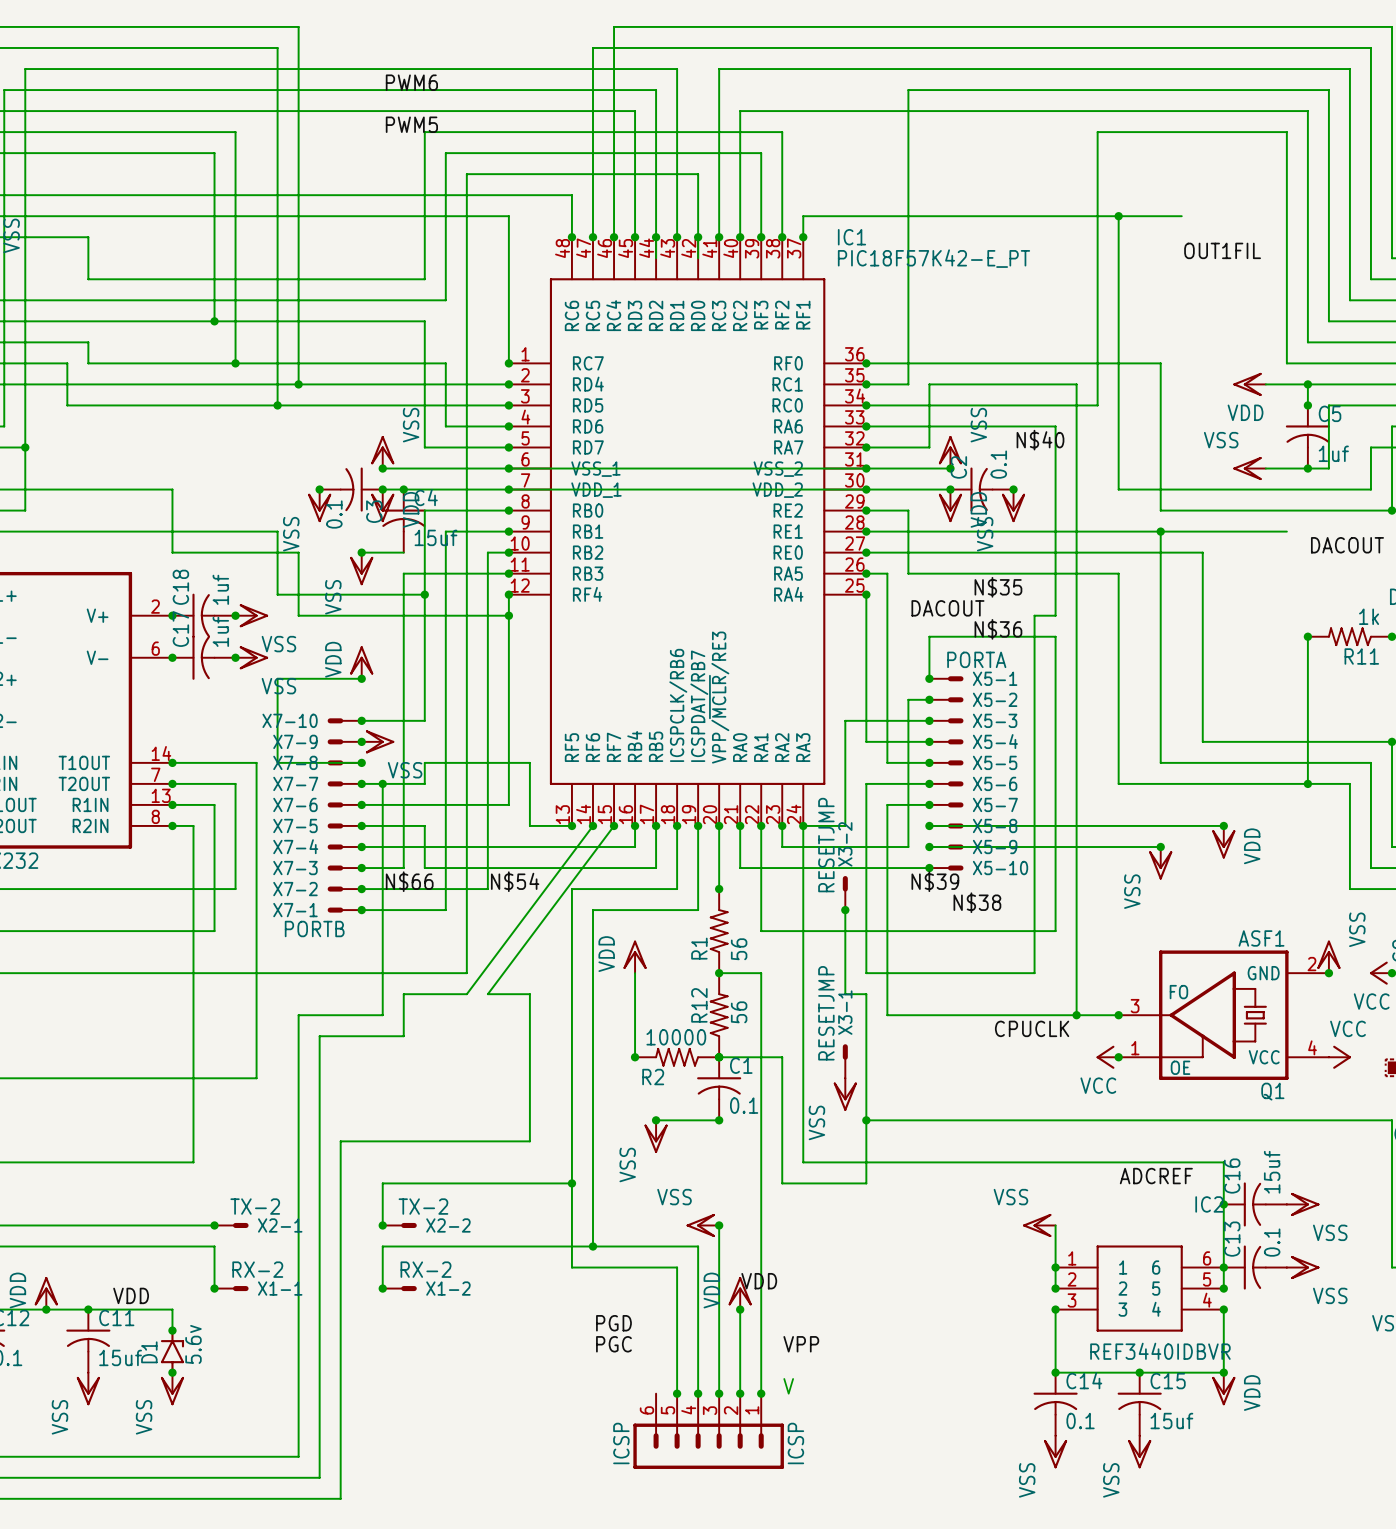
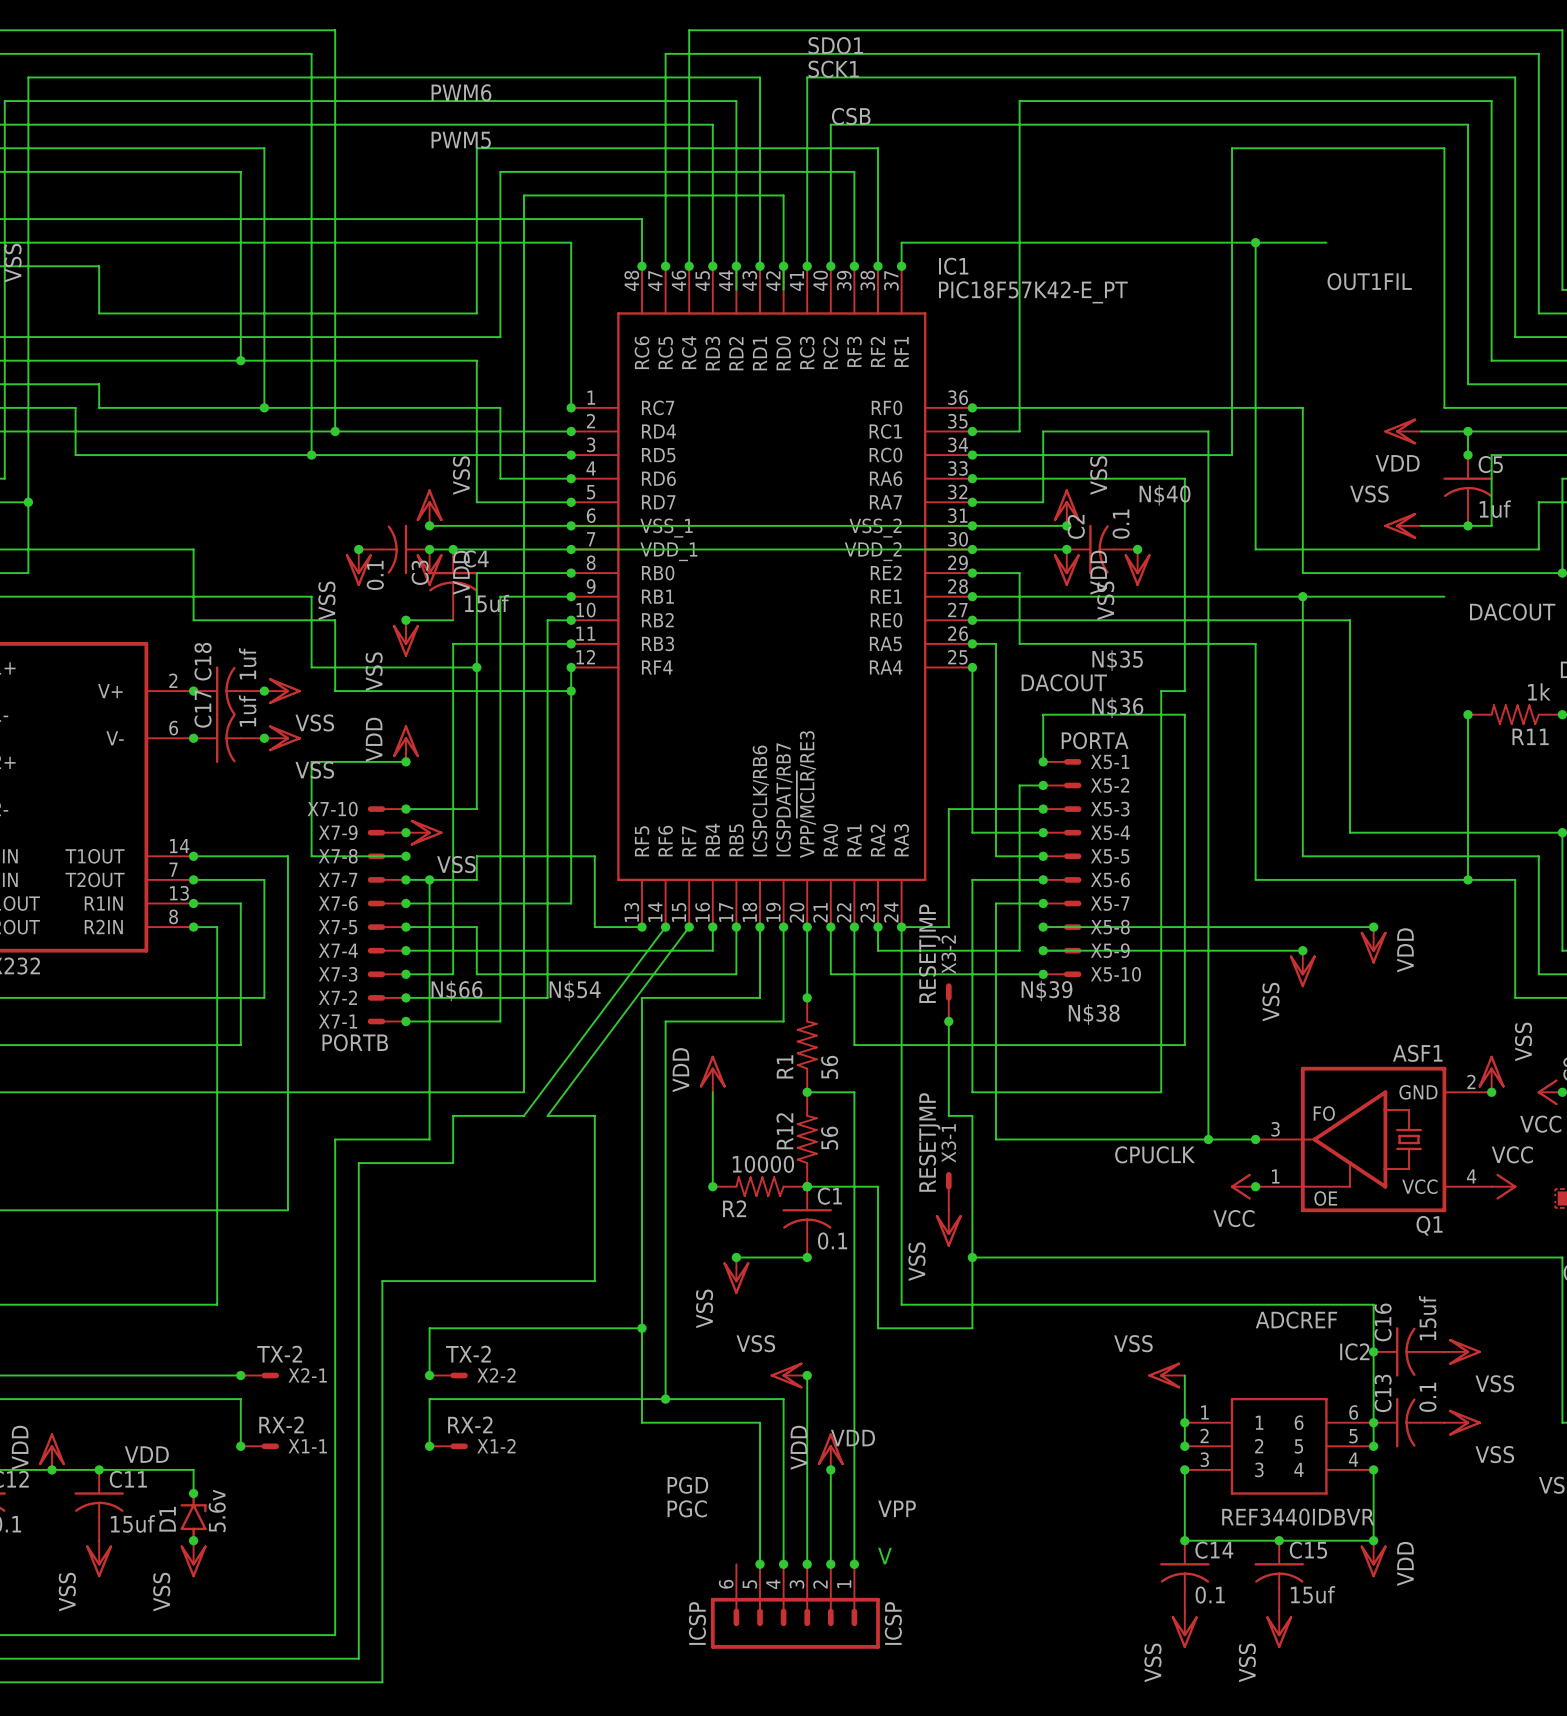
label: none -> SDO1 (835, 45)
label: none -> SCK1 (833, 69)
label: none -> CSB (851, 116)

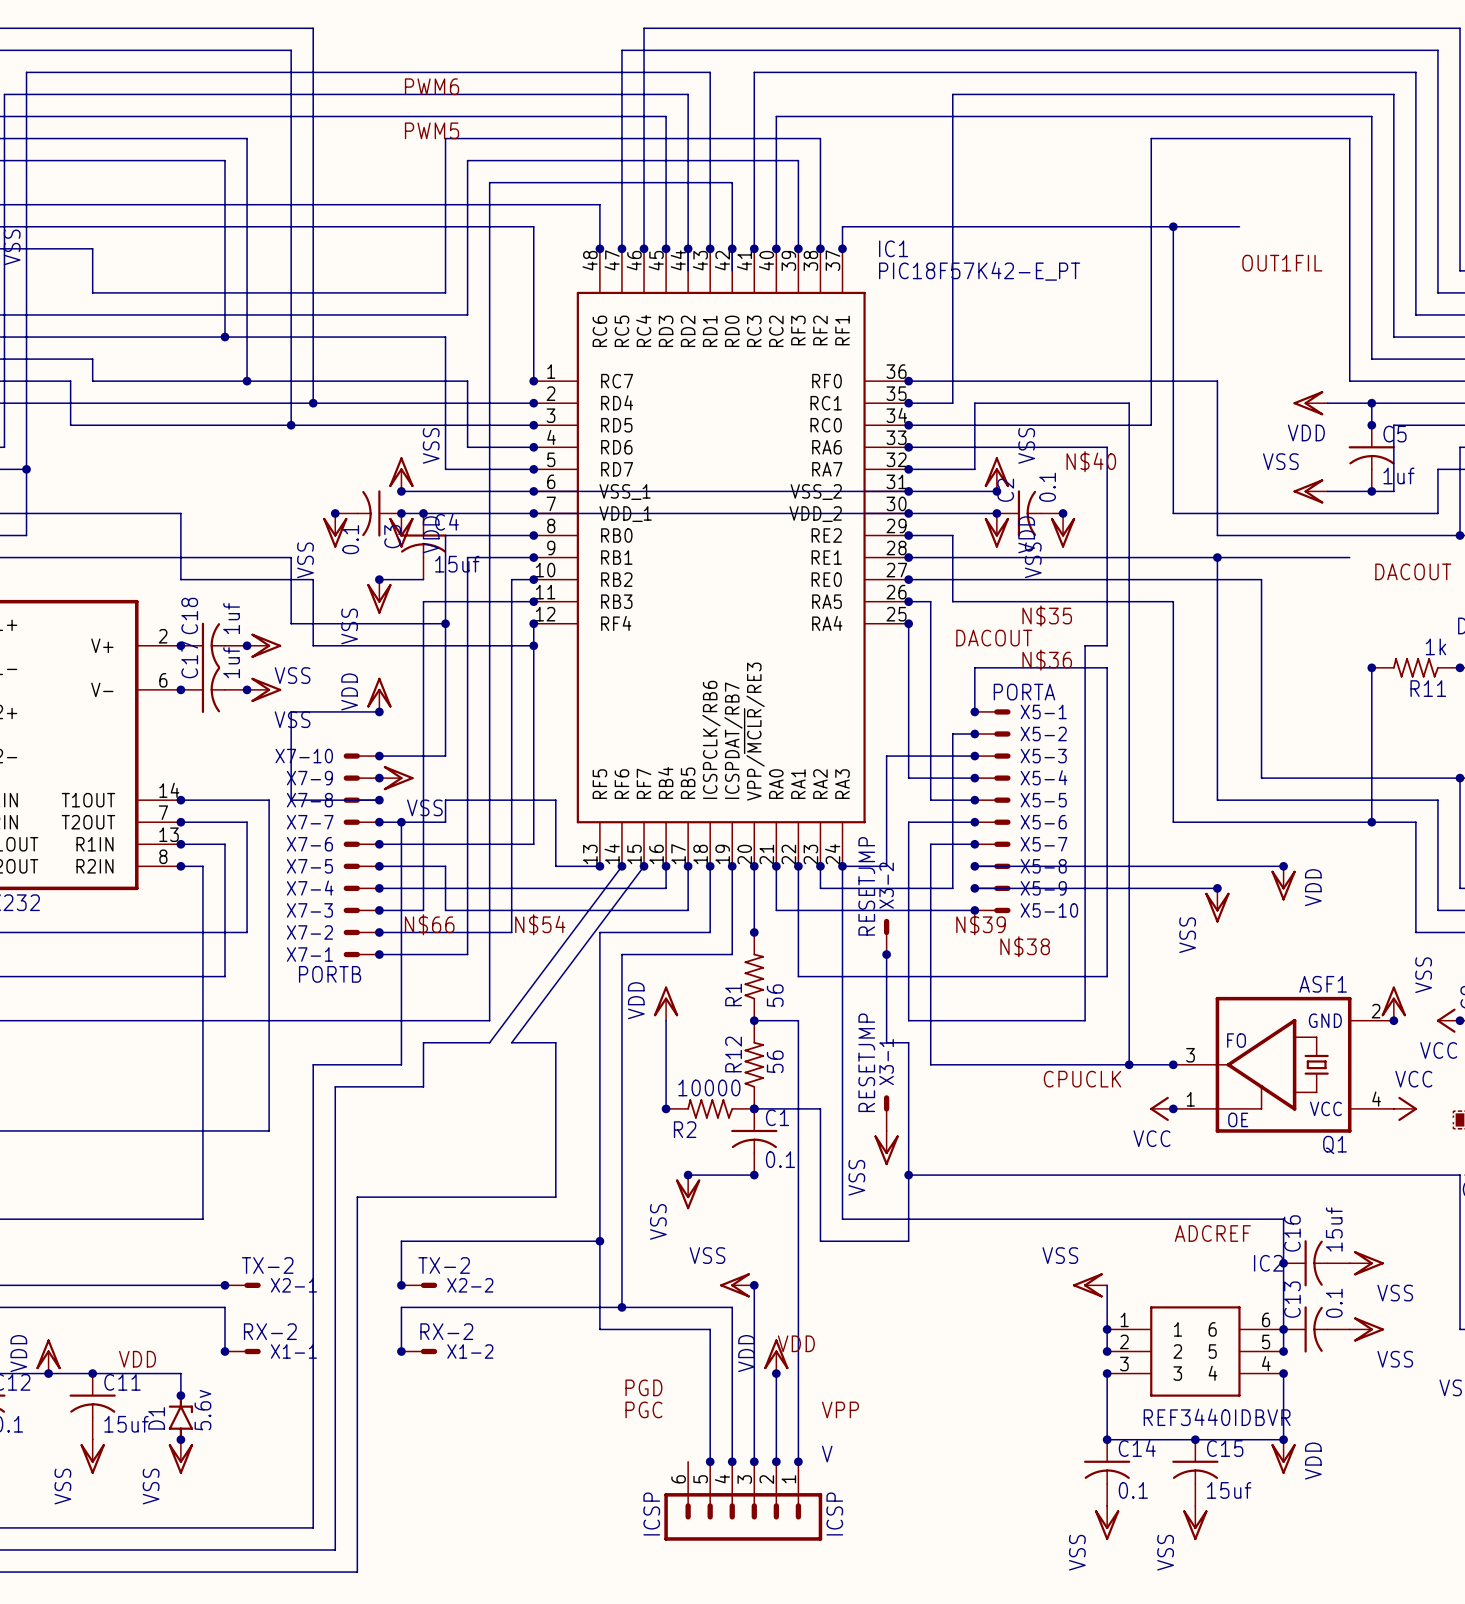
label: SDO1 (835, 45) -> none
label: SCK1 (833, 69) -> none
label: CSB (851, 116) -> none

